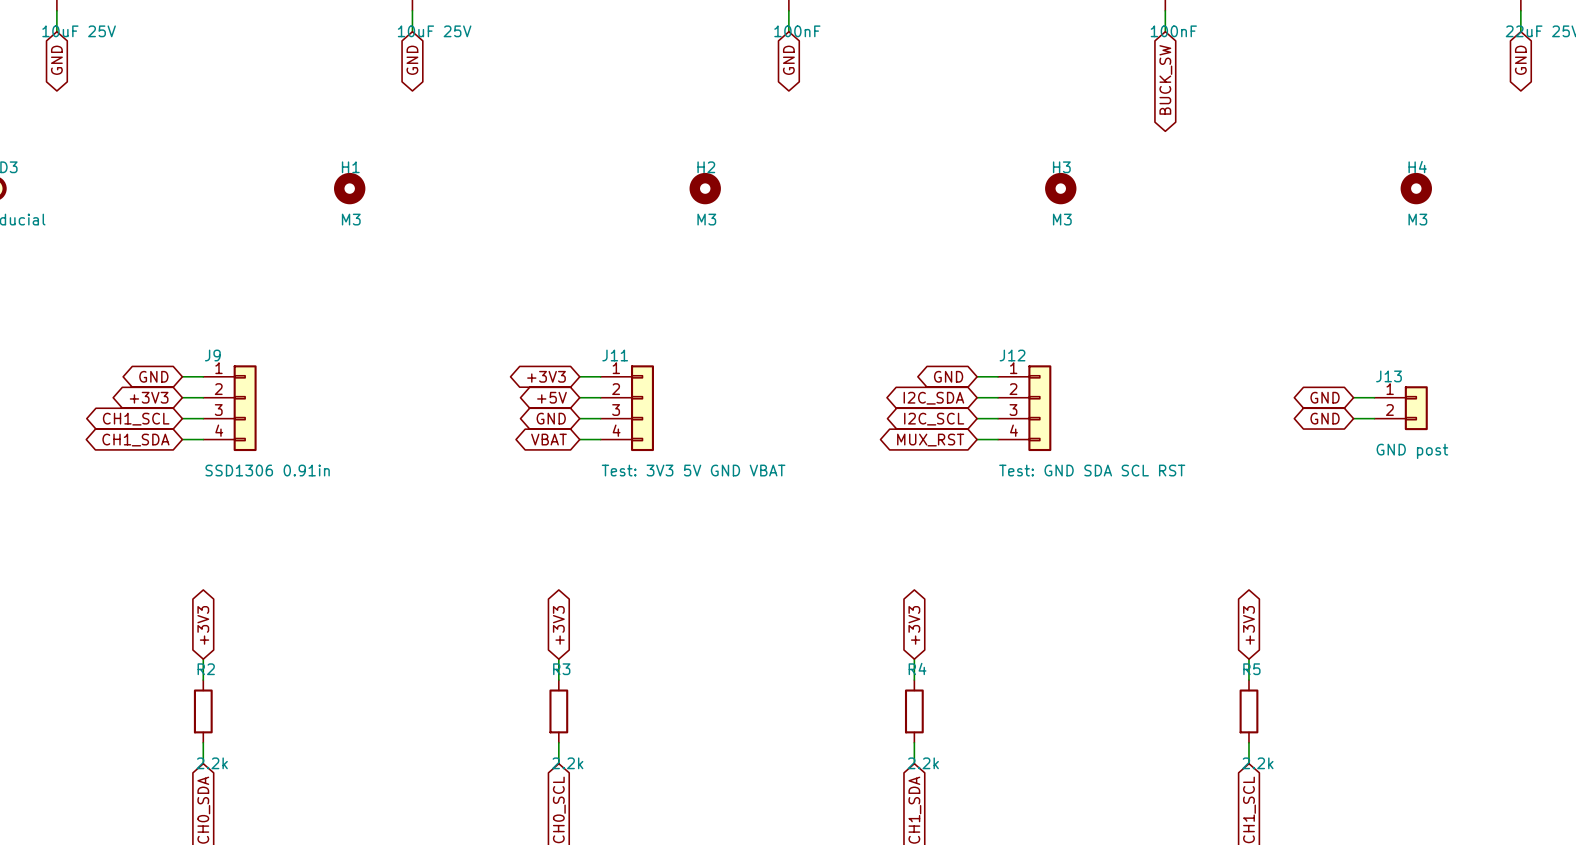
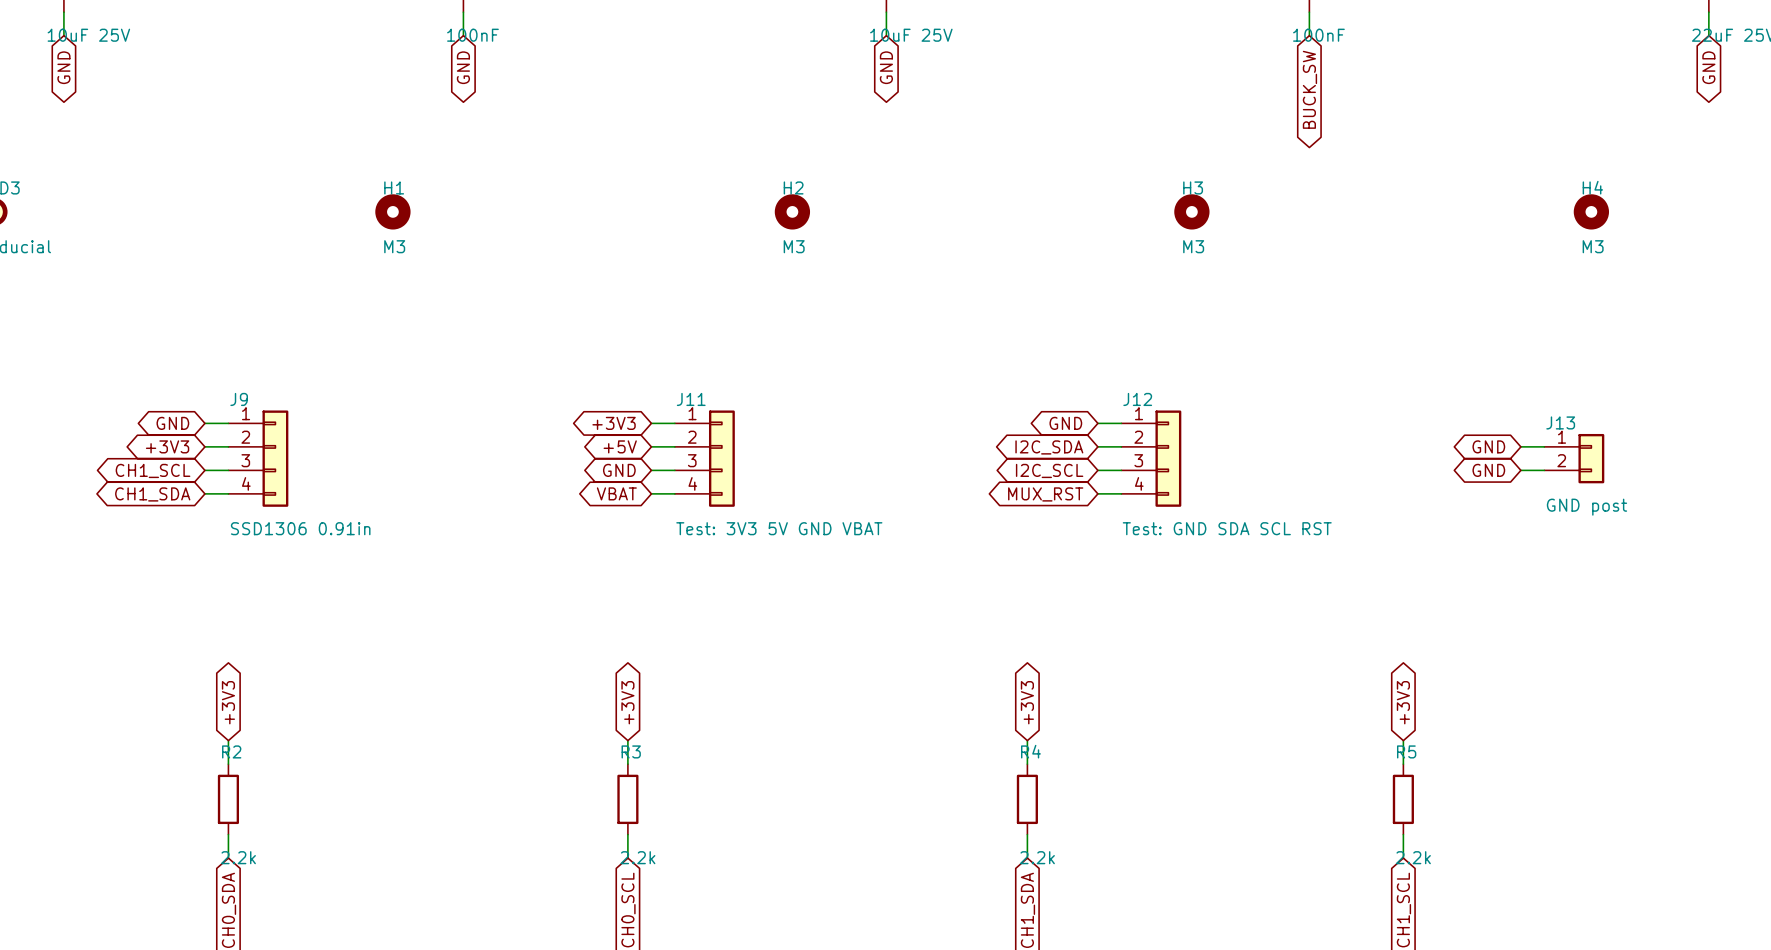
part value: 10uF 25V (434, 31) -> 100nF (472, 35)
part value: 100nF (797, 31) -> 10uF 25V (911, 35)

